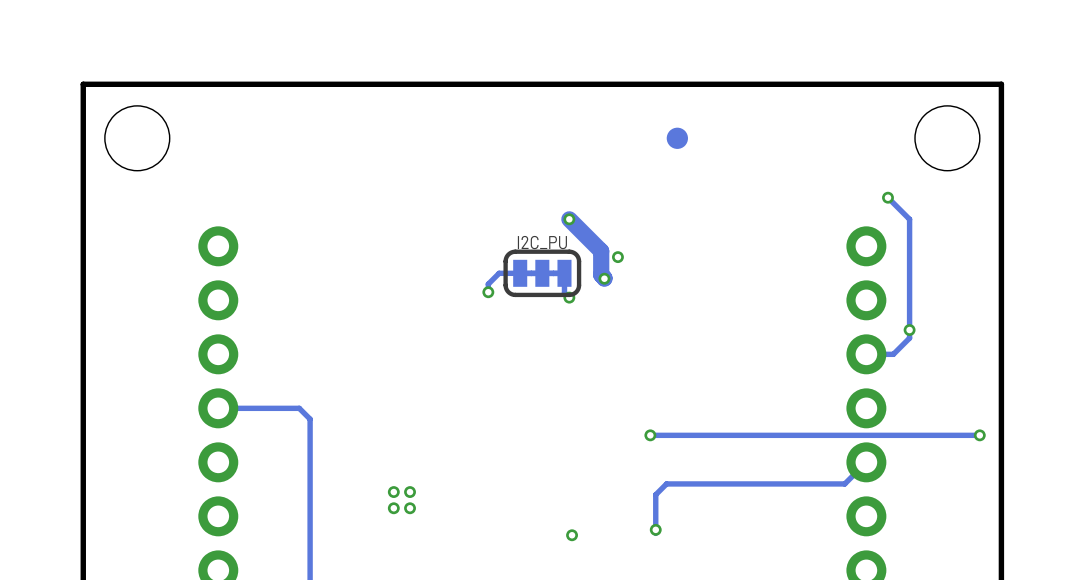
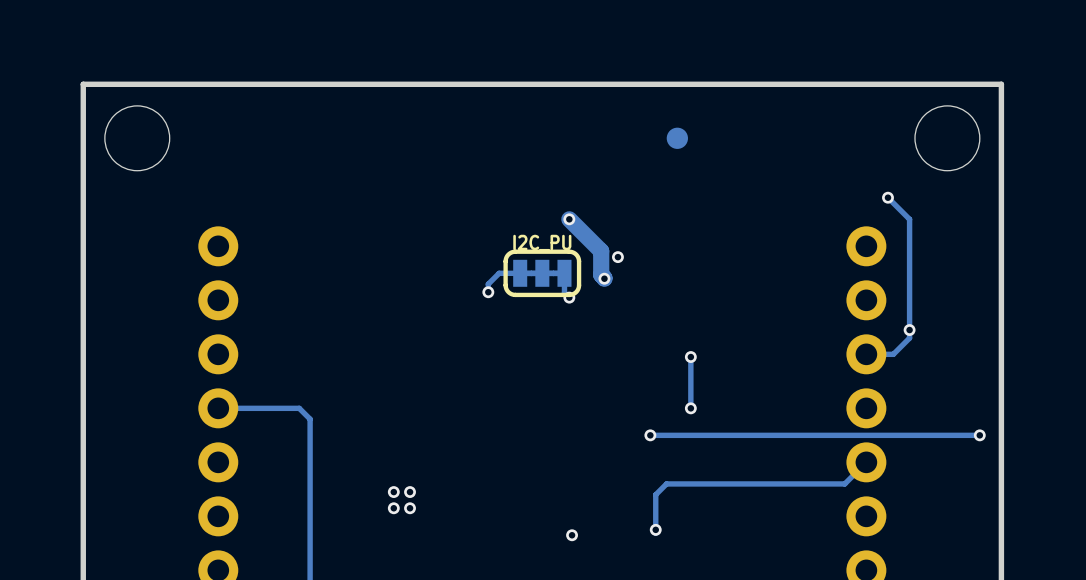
track: none -> (690, 357) (690, 408)
via: none -> (690, 357)
via: none -> (690, 408)

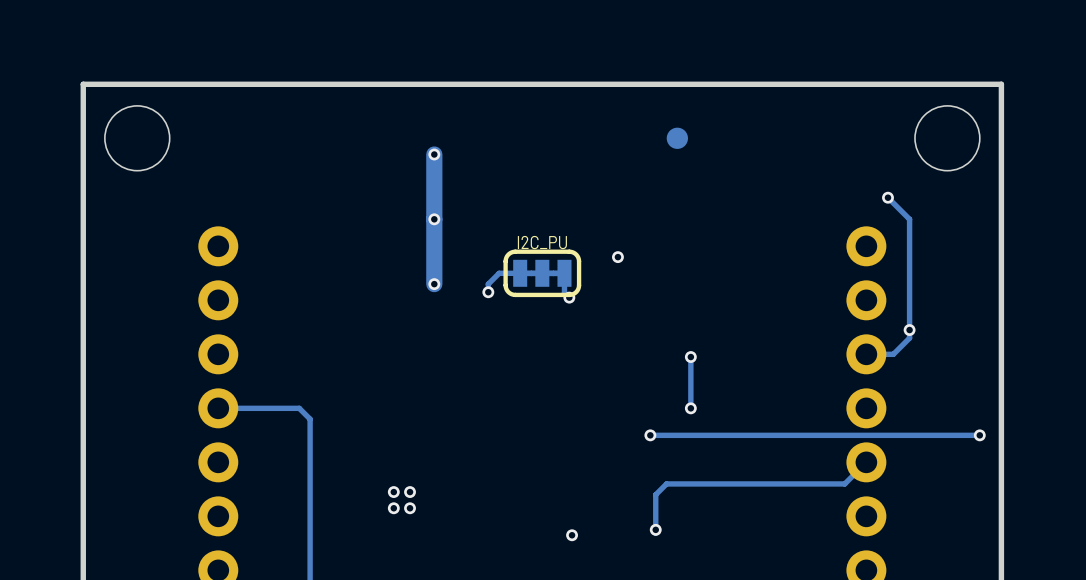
track: none -> (434, 154) (434, 284)
via: none -> (434, 154)
via: none -> (434, 219)
track: (569, 219) (601, 251) (601, 274) (604, 278) -> none
via: (569, 219) -> none
via: (604, 278) -> none
via: none -> (434, 284)

